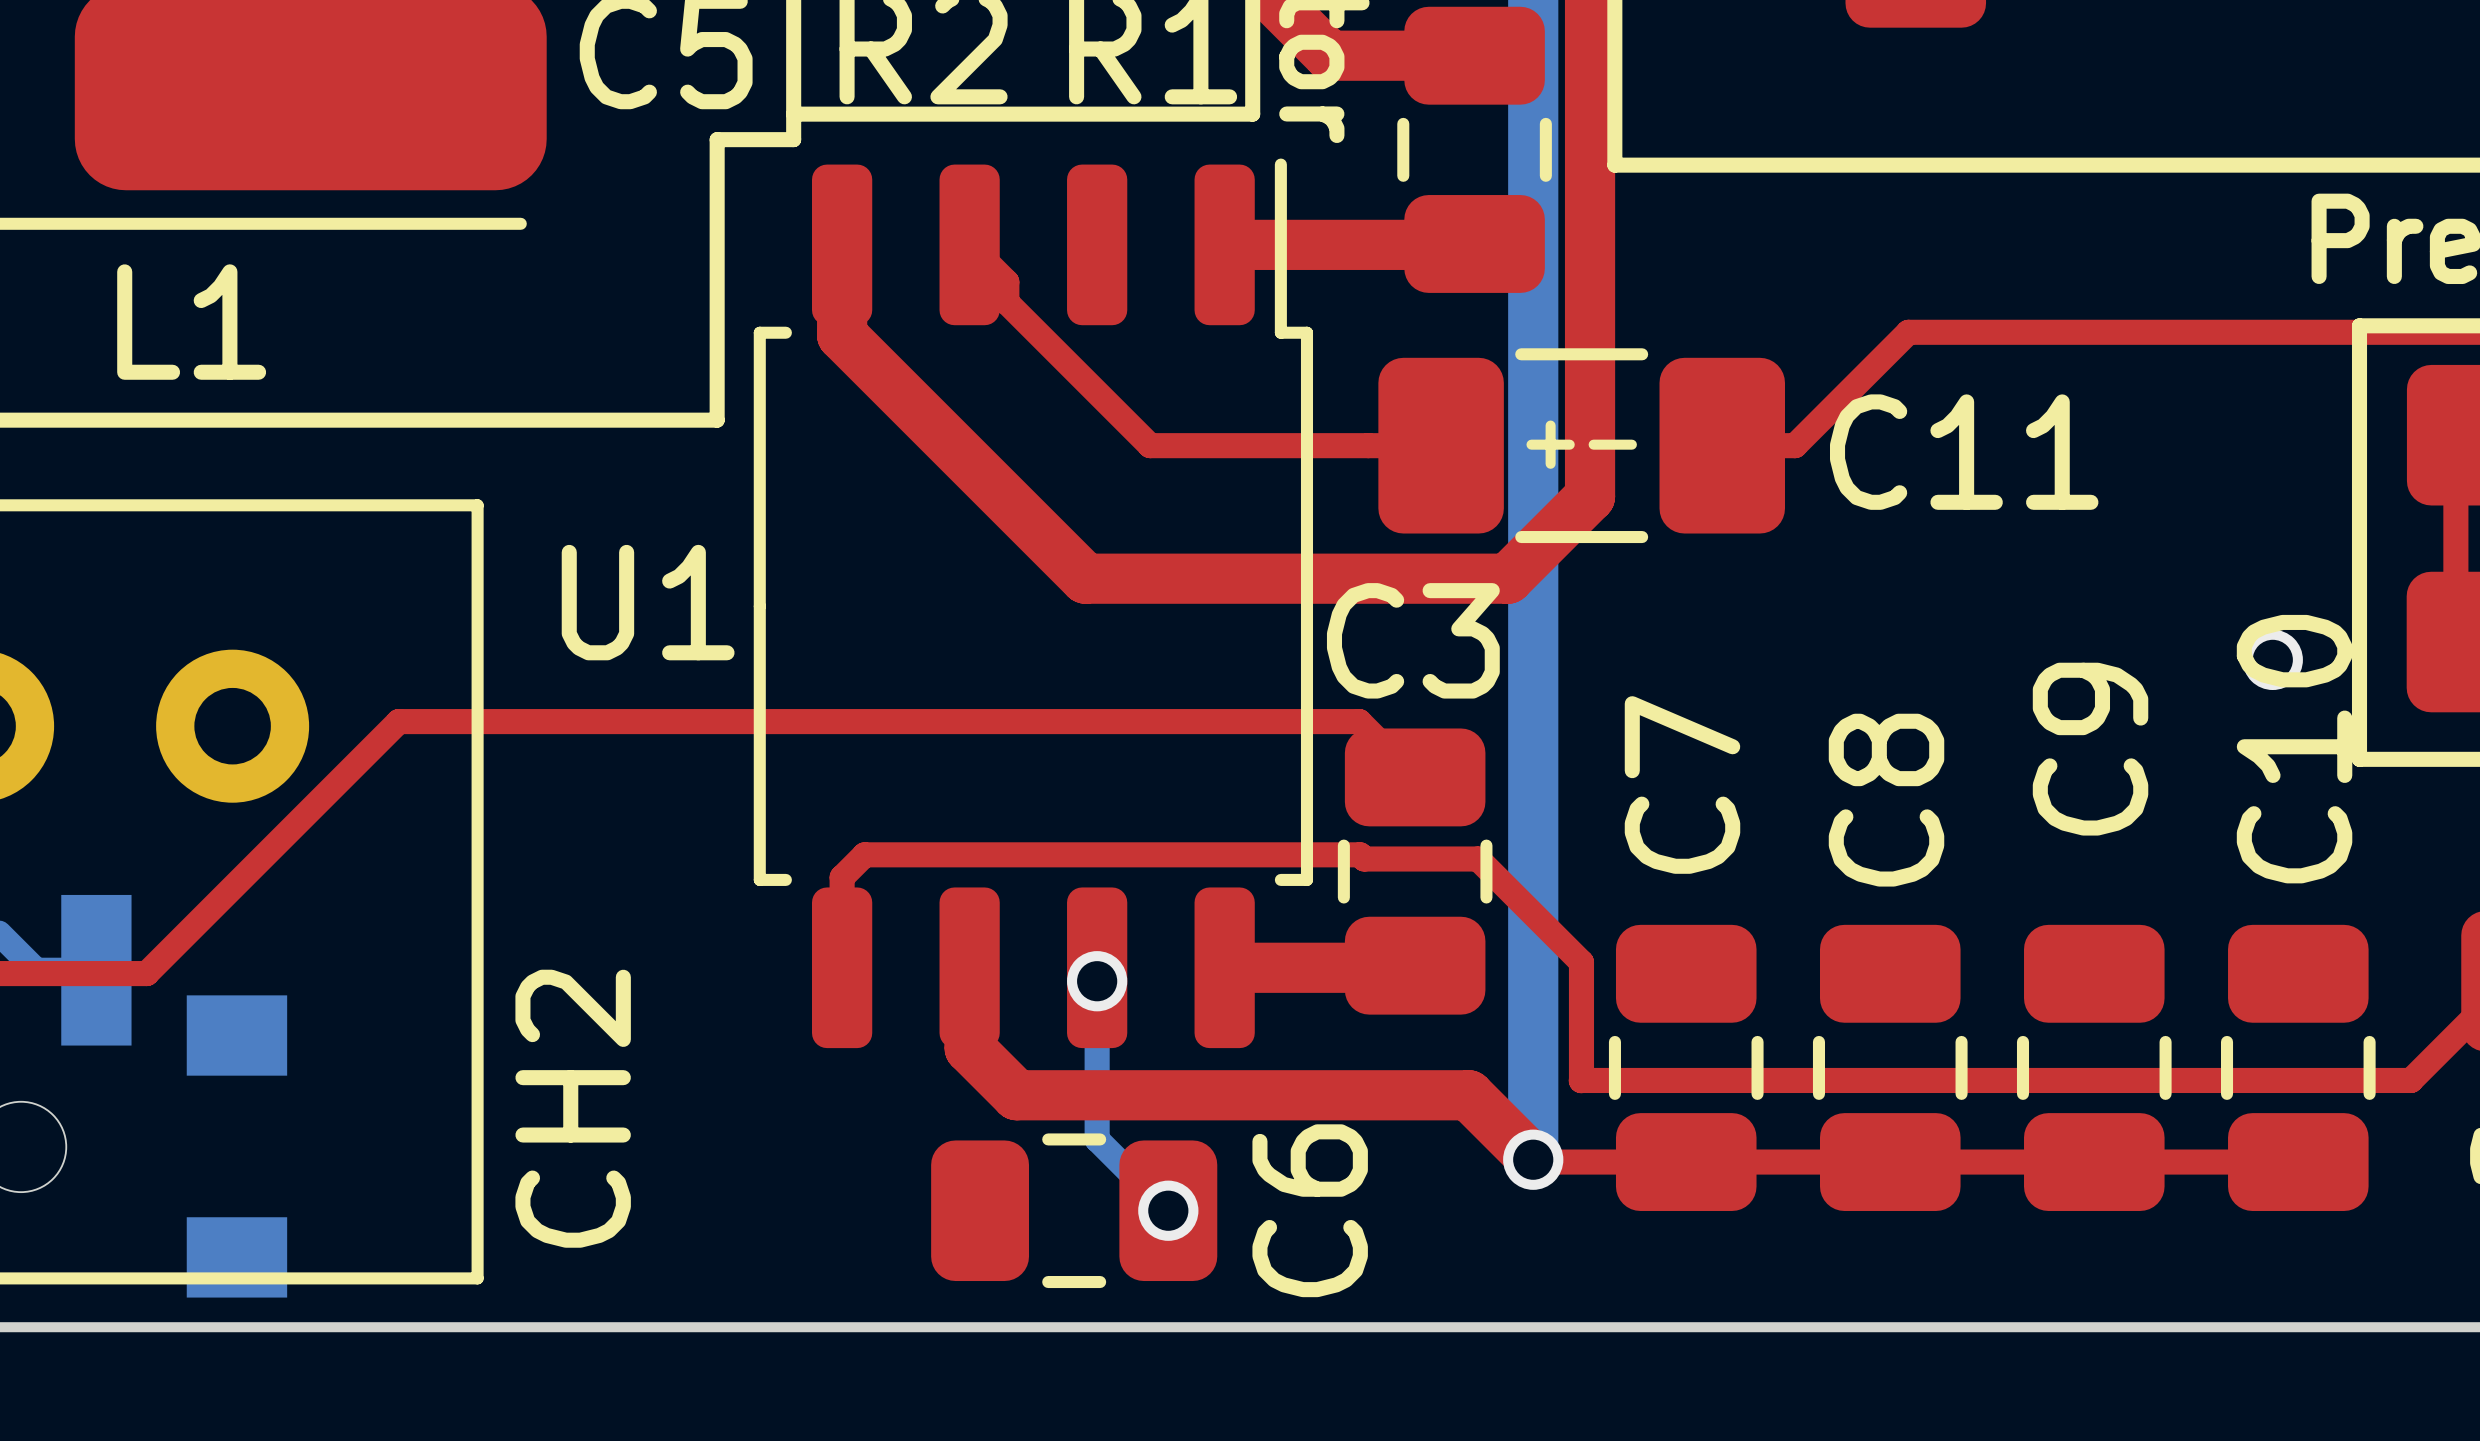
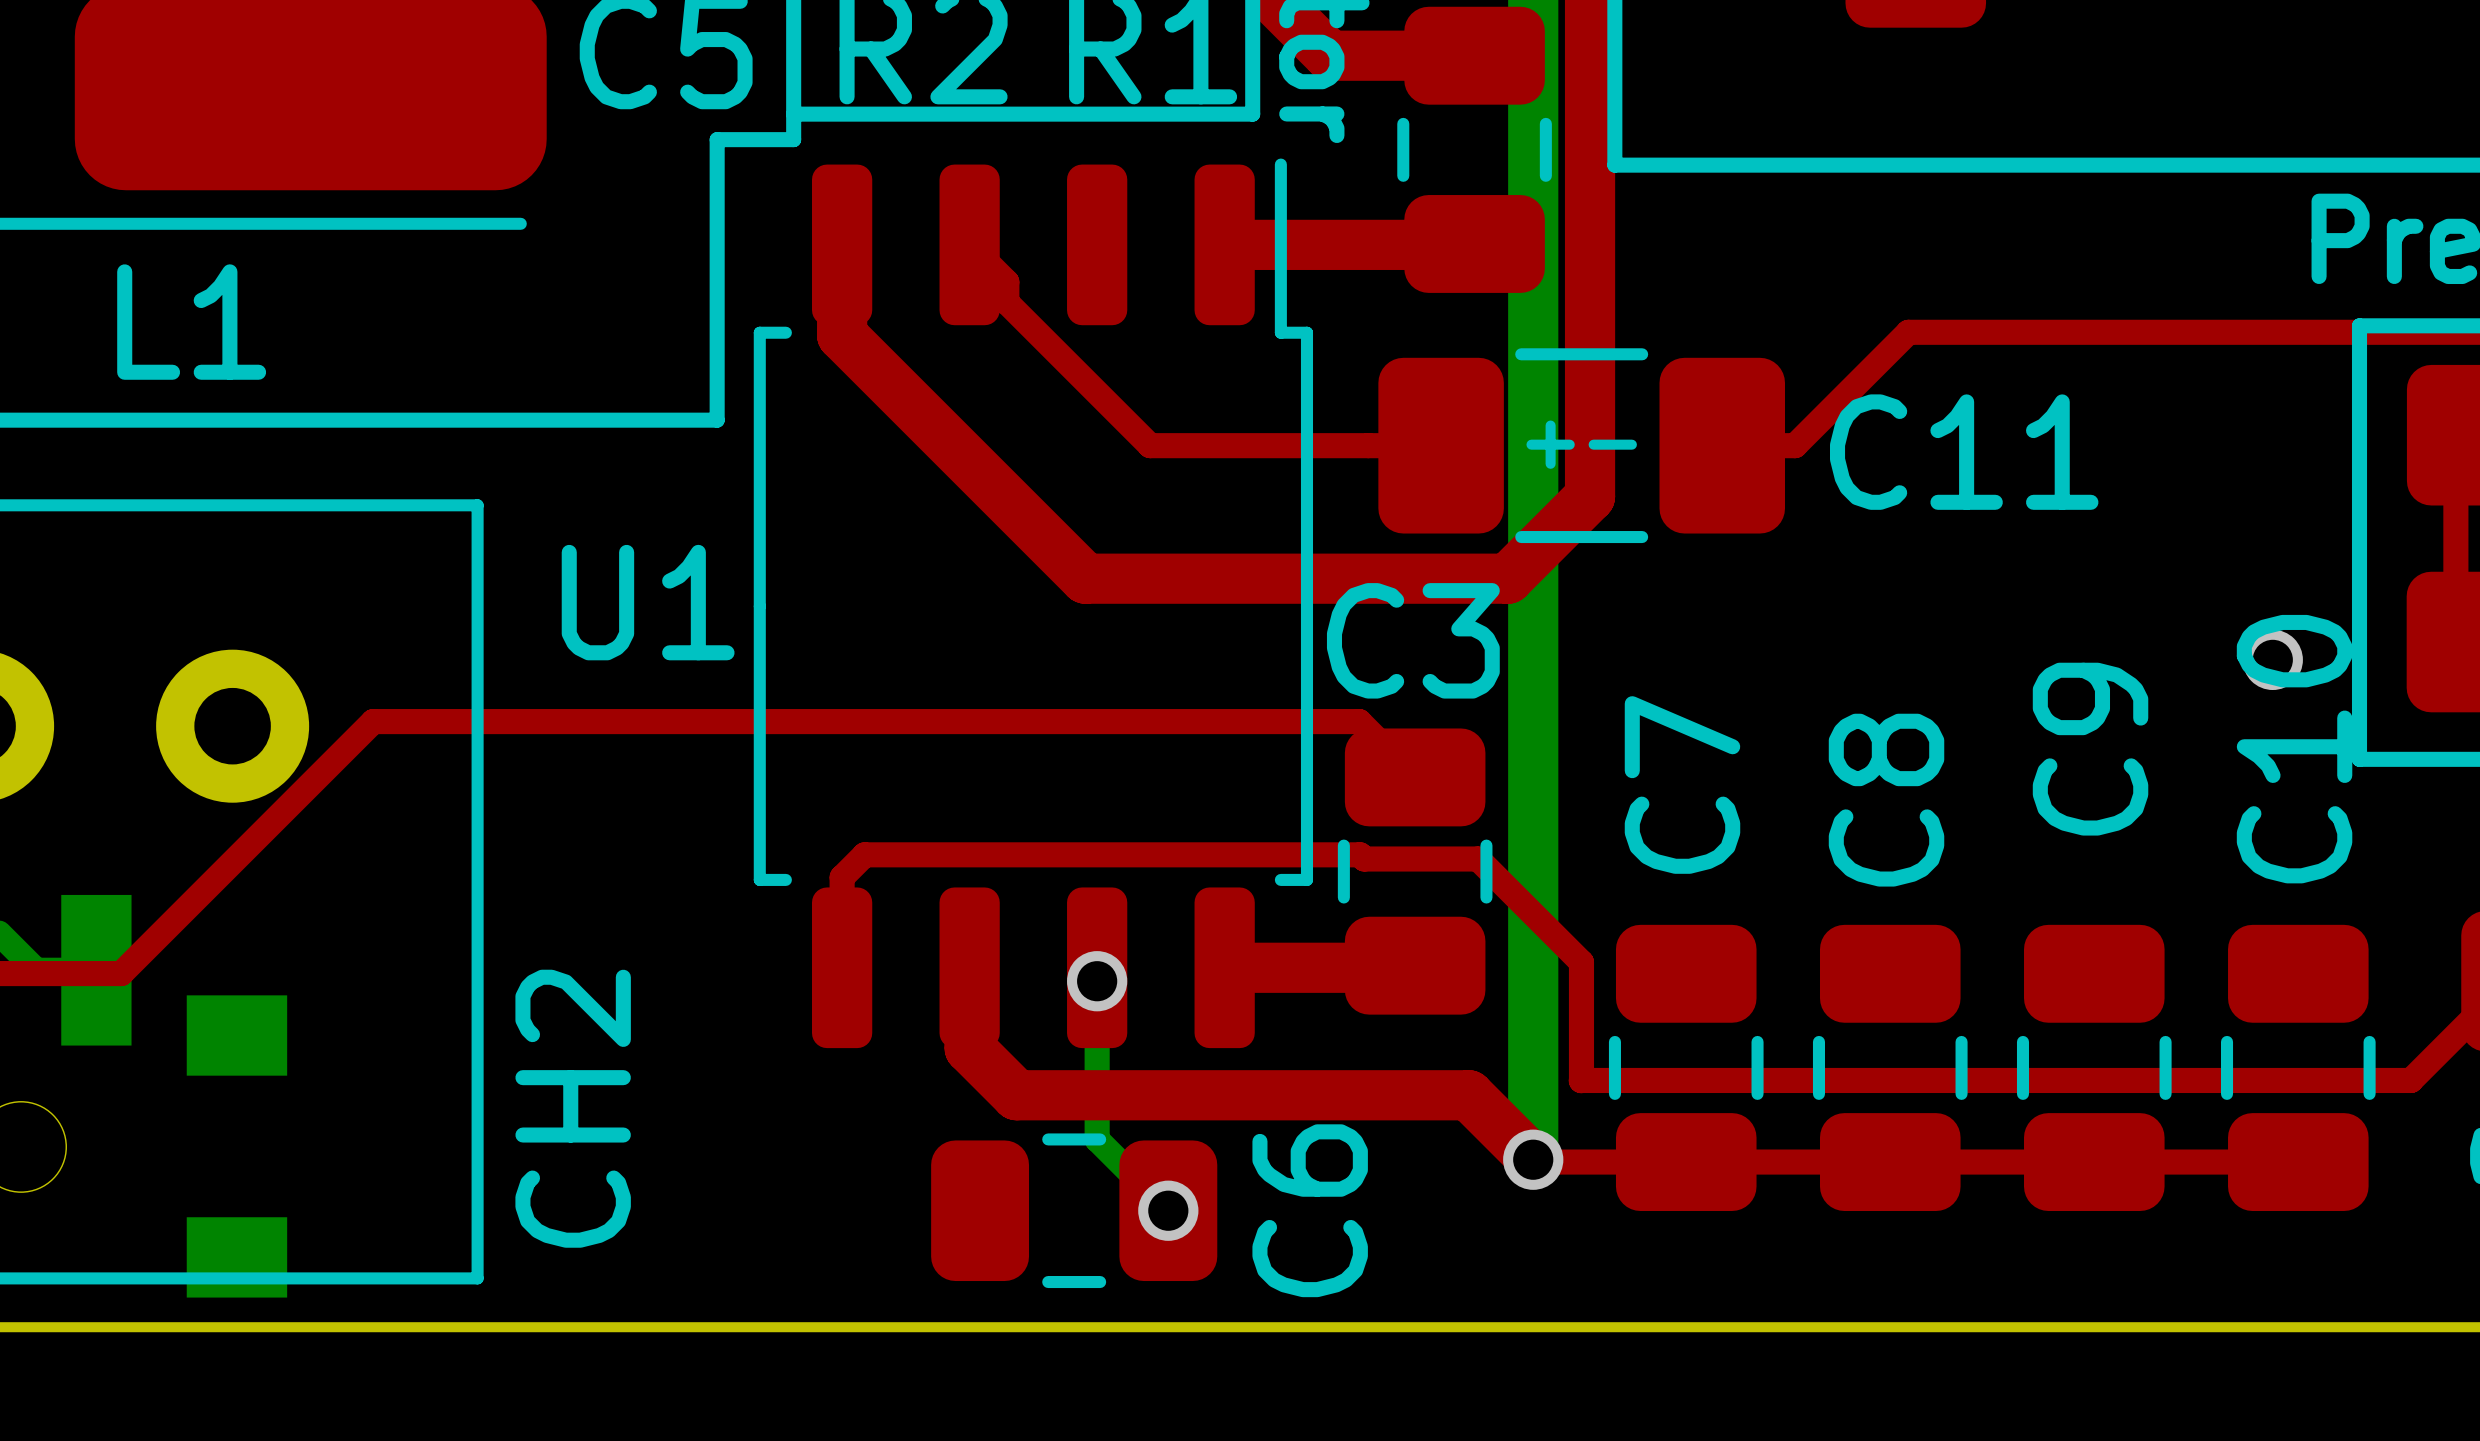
top track: (398, 721) (146, 973) (121, 973) -> (398, 721) (373, 721) (121, 973)

